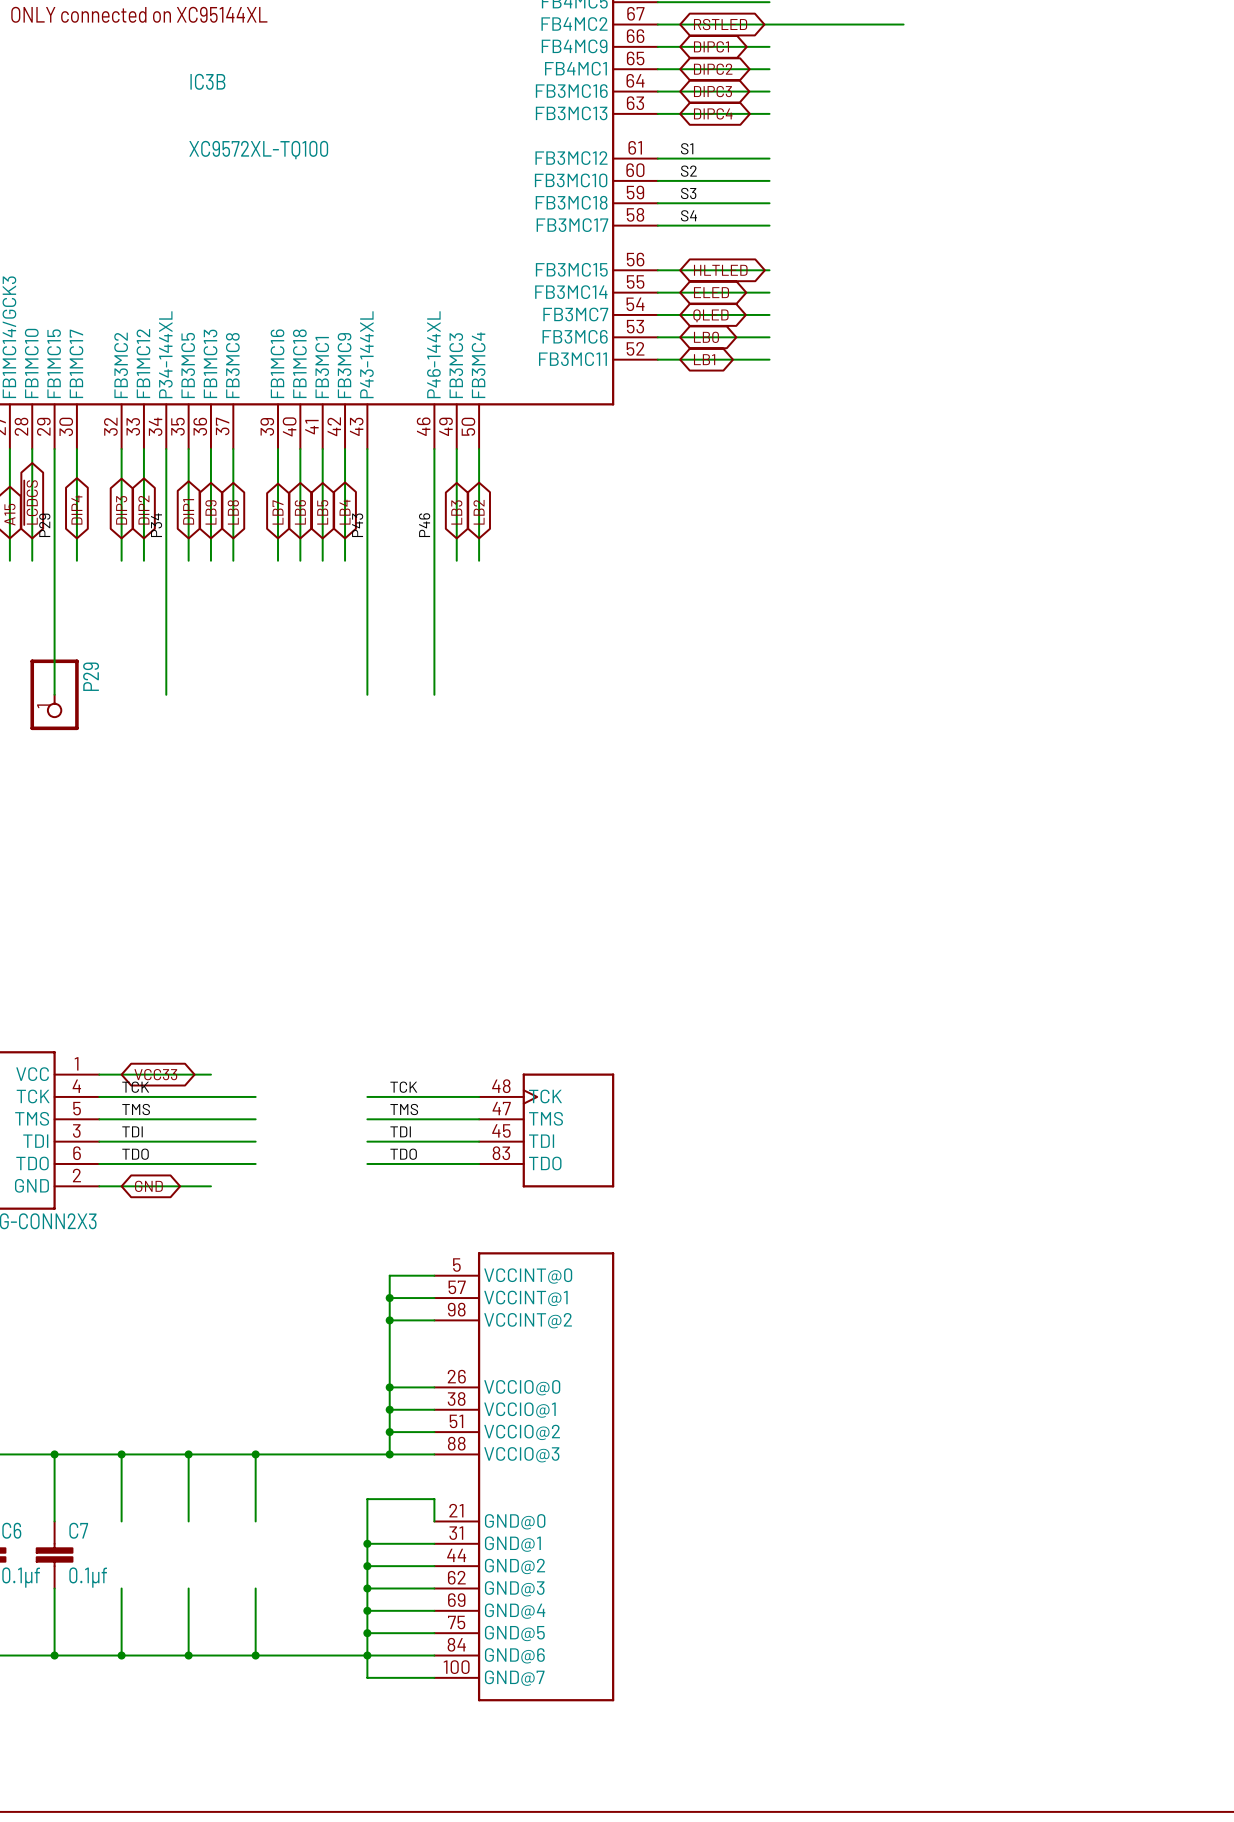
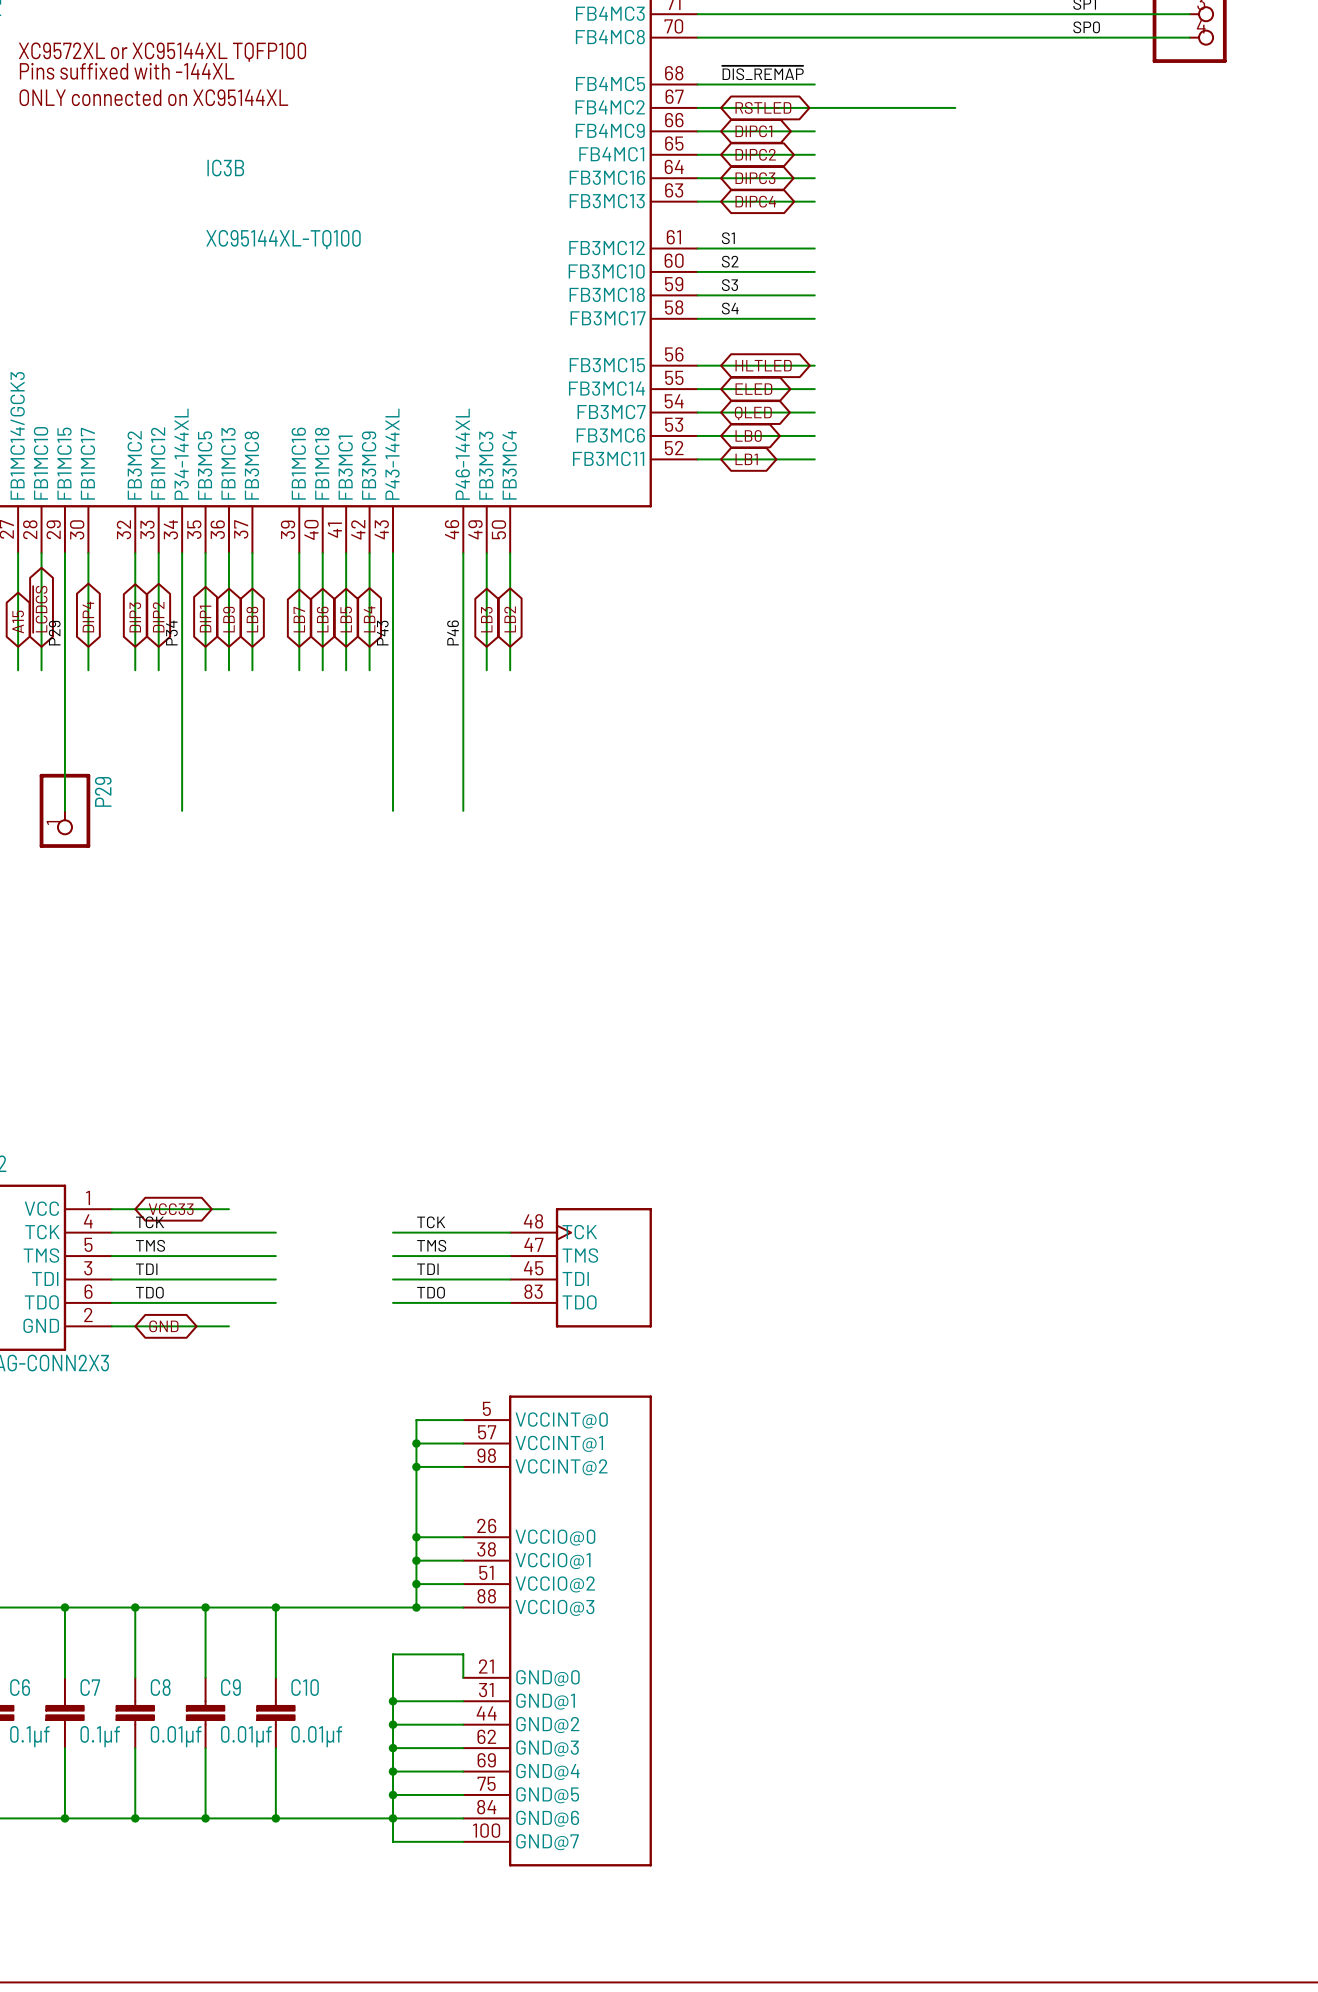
IC3B value: XC9572XL-TQ100 (258, 150) -> XC95144XL-TQ100 (283, 239)
C8: none -> 0.01µf (135, 1712)
C9: none -> 0.01µf (205, 1712)
C10: none -> 0.01µf (275, 1712)

